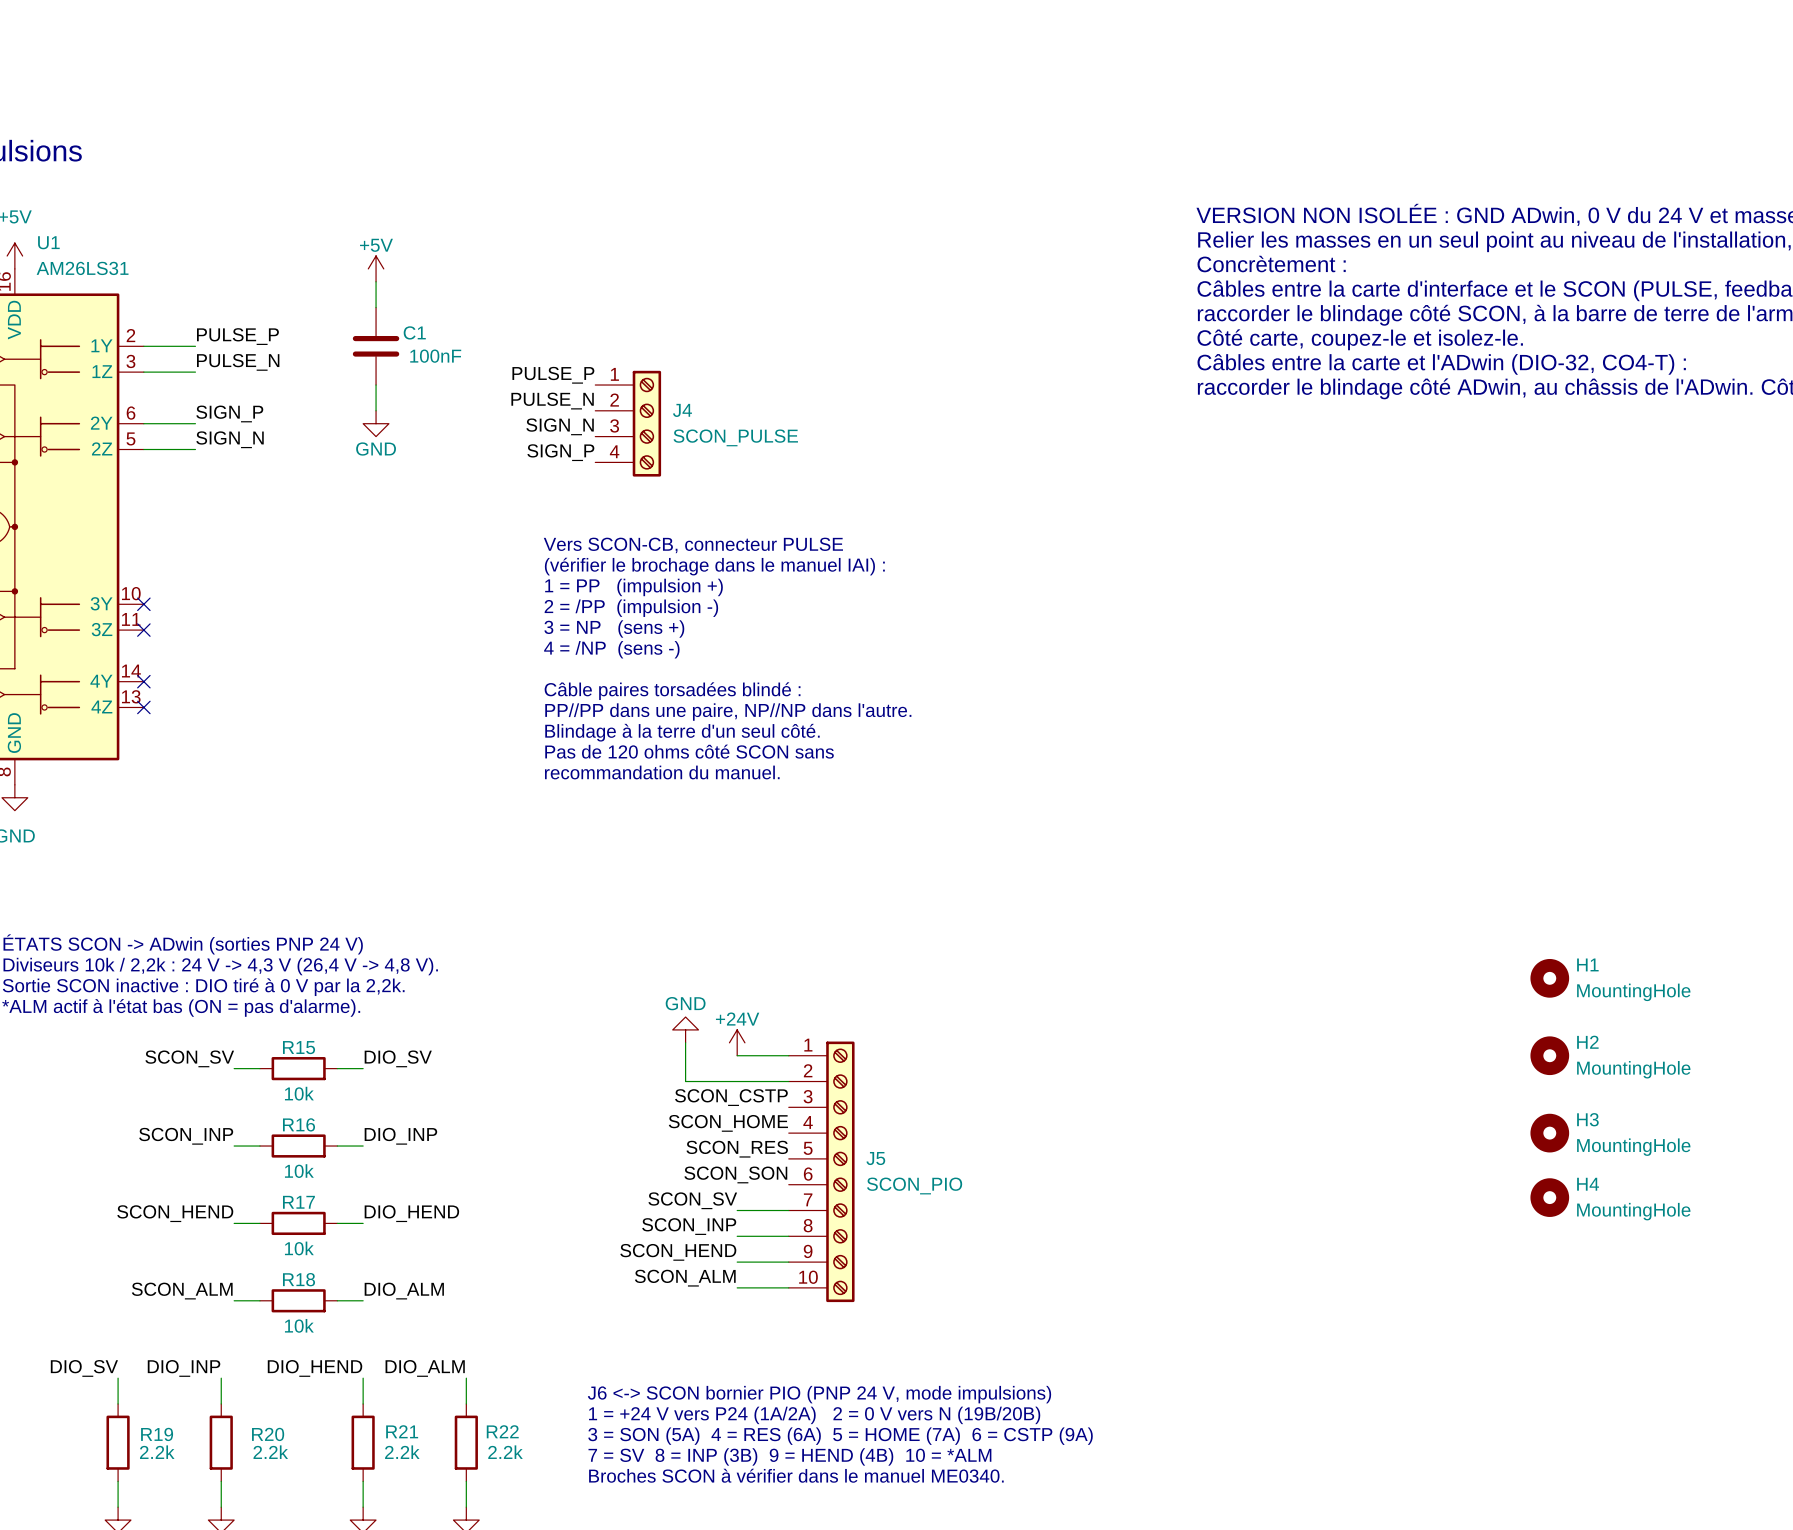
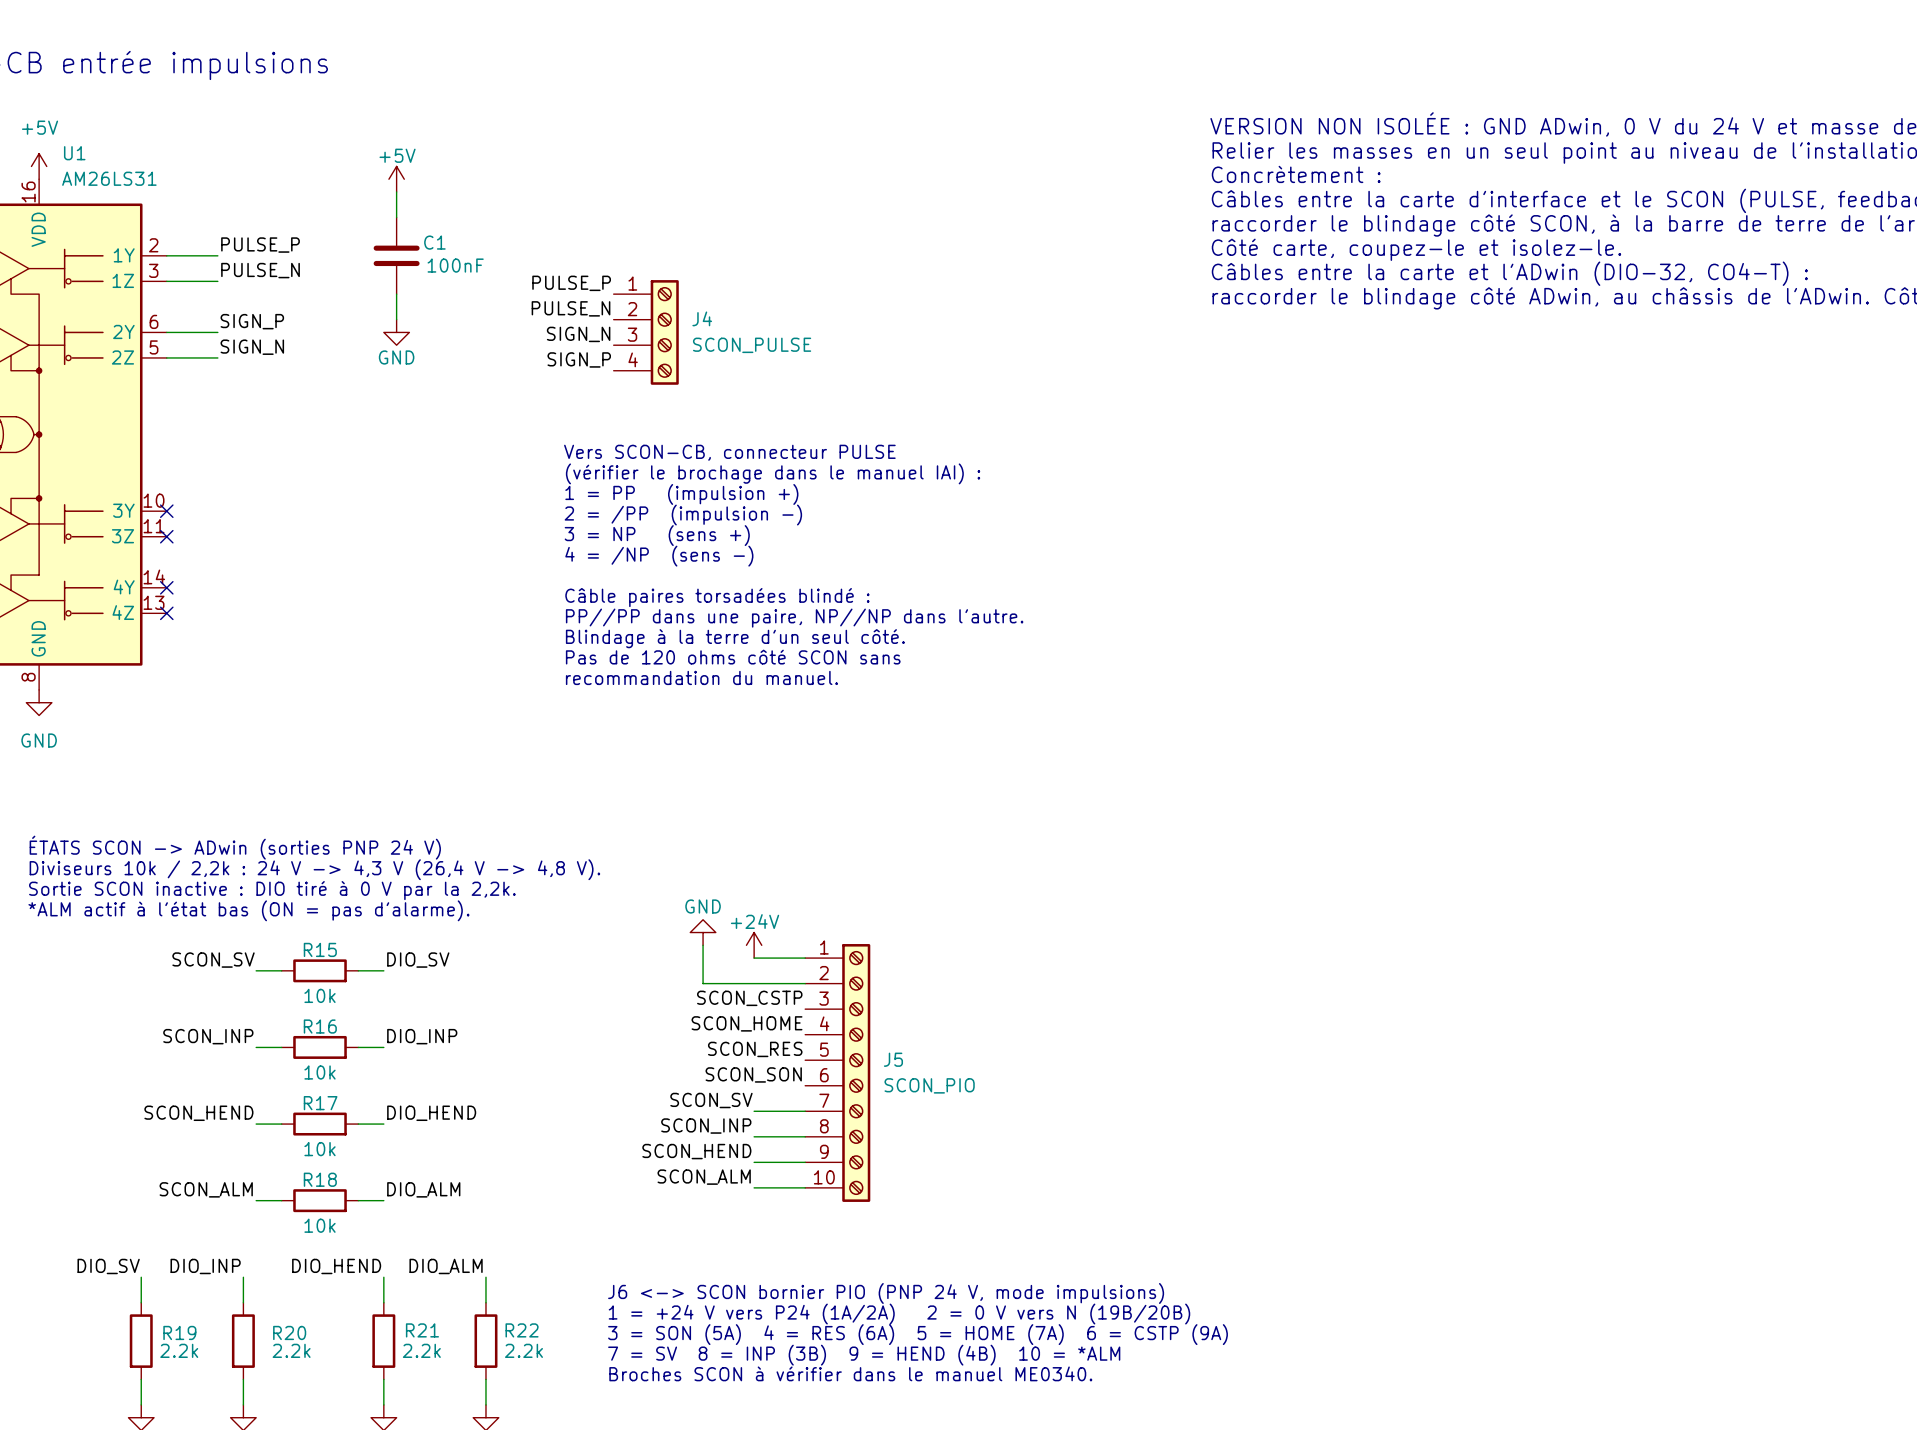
H1: MountingHole (1549, 978) -> none
H2: MountingHole (1549, 1055) -> none
H3: MountingHole (1549, 1133) -> none
H4: MountingHole (1549, 1197) -> none

